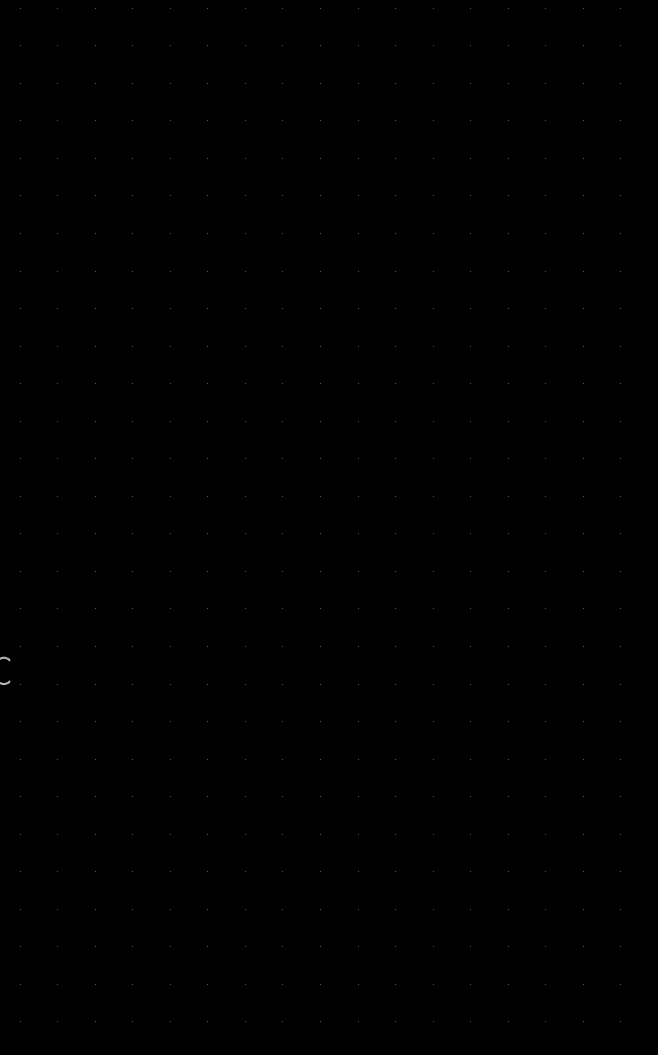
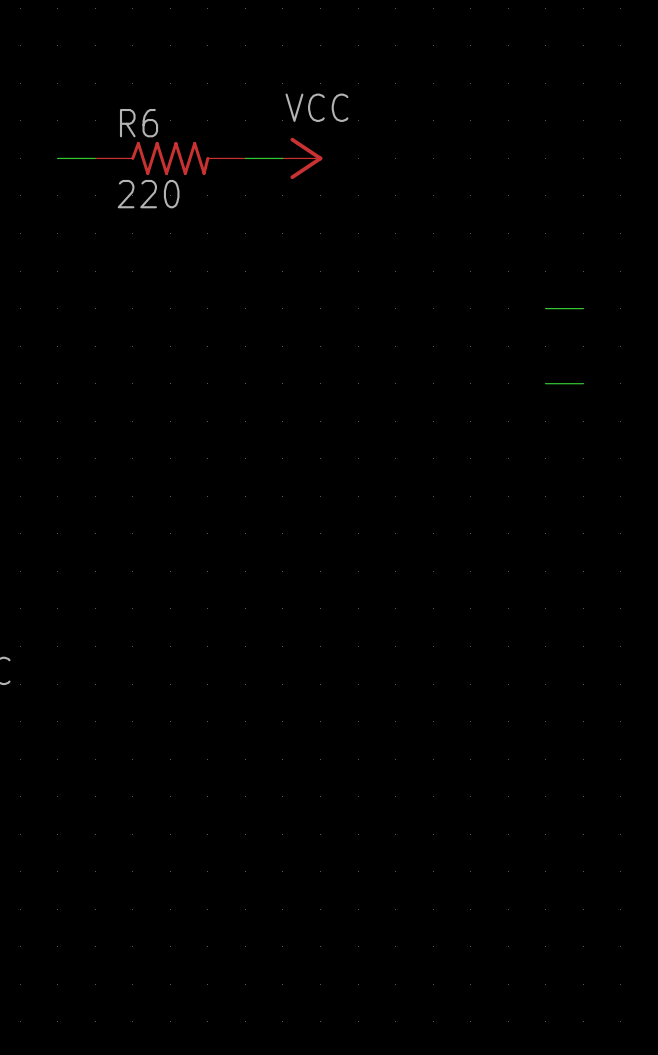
wire: none -> (57, 158) (95, 158)
R6: none -> 220 (170, 158)
wire: none -> (245, 158) (282, 158)
power symbol: none -> VCC (302, 158)
wire: none -> (545, 308) (583, 308)
wire: none -> (545, 383) (583, 383)

